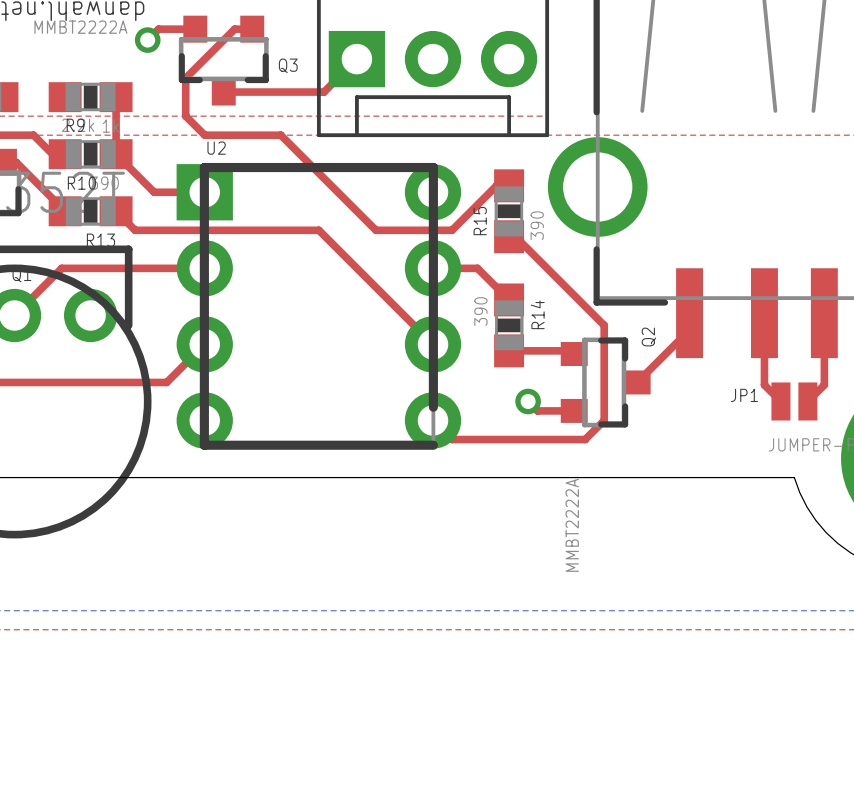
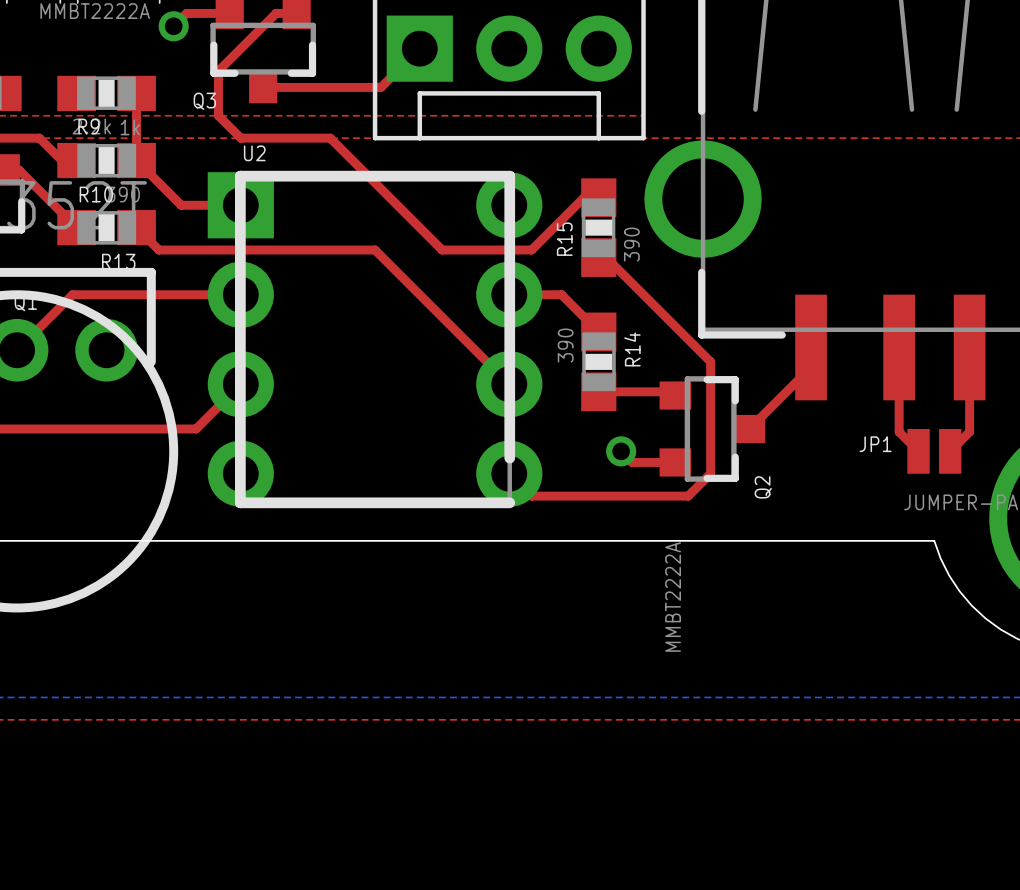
Q3 name position: Q3 (288, 65) -> Q3 (204, 101)
Q2 name position: Q2 (648, 337) -> Q2 (763, 487)

